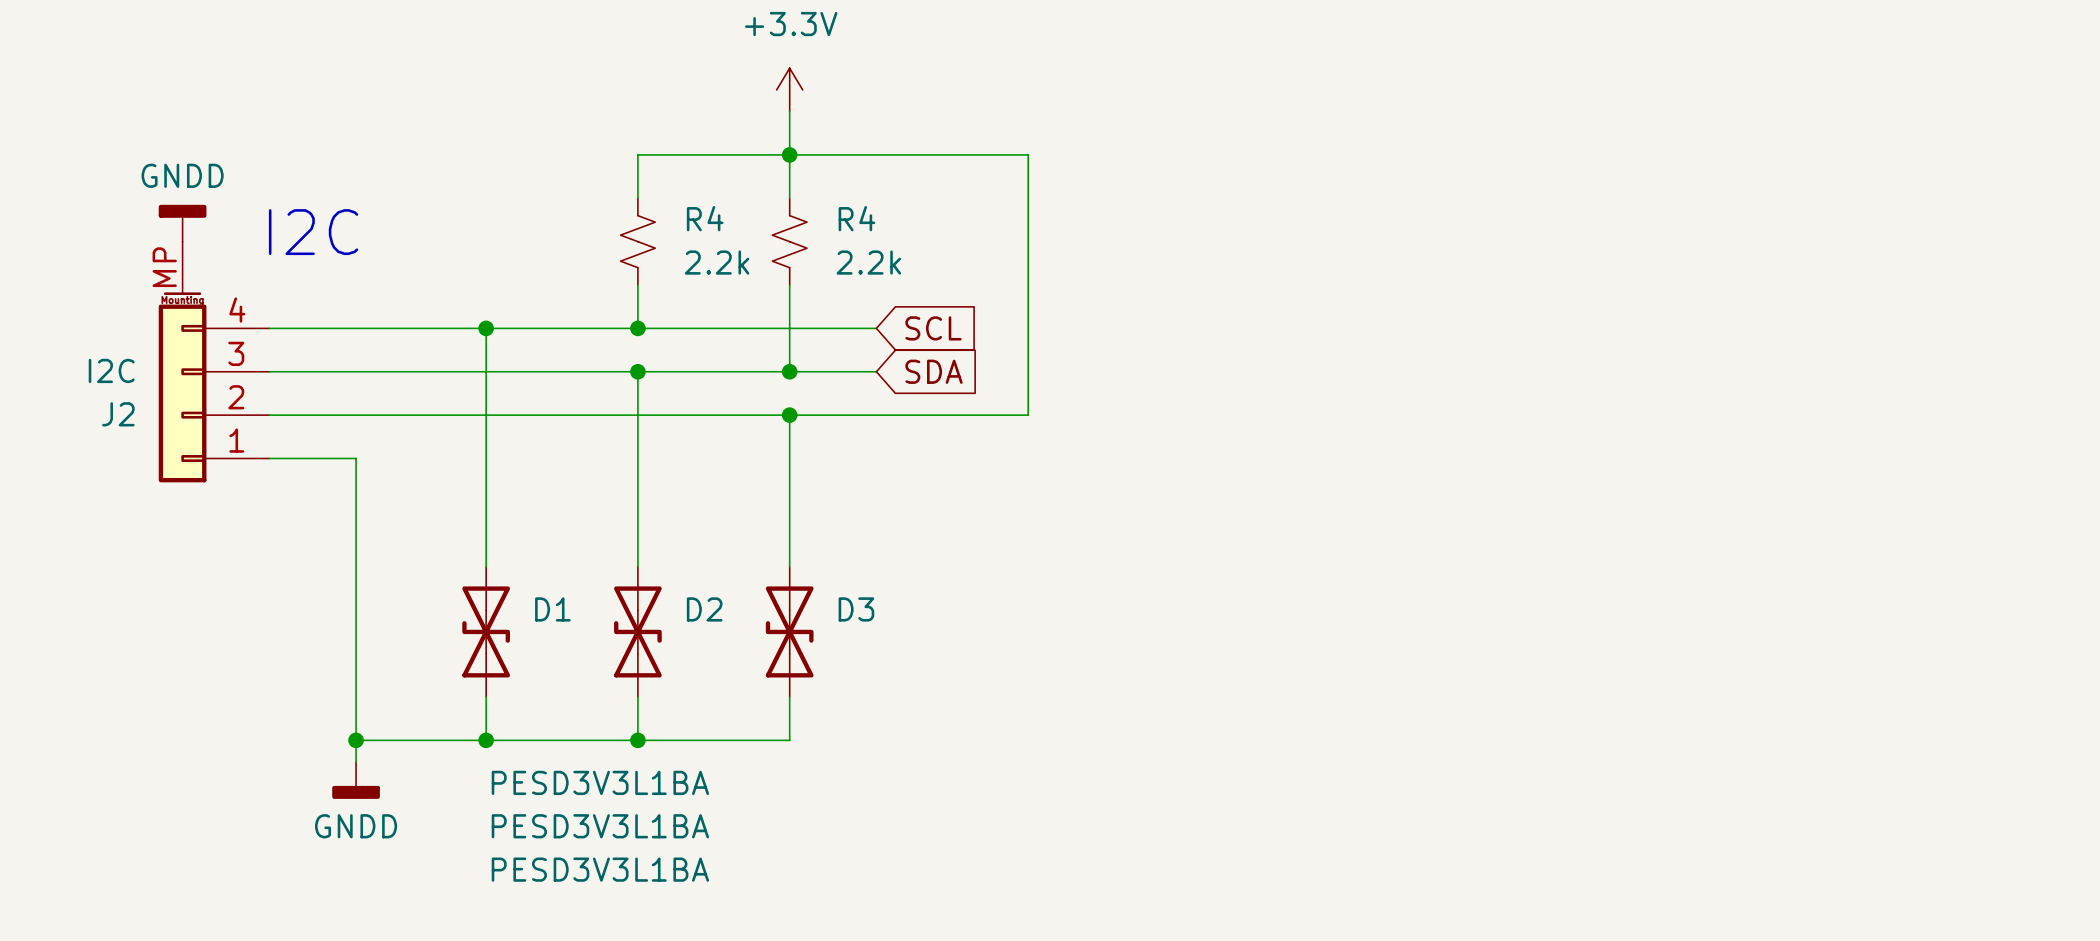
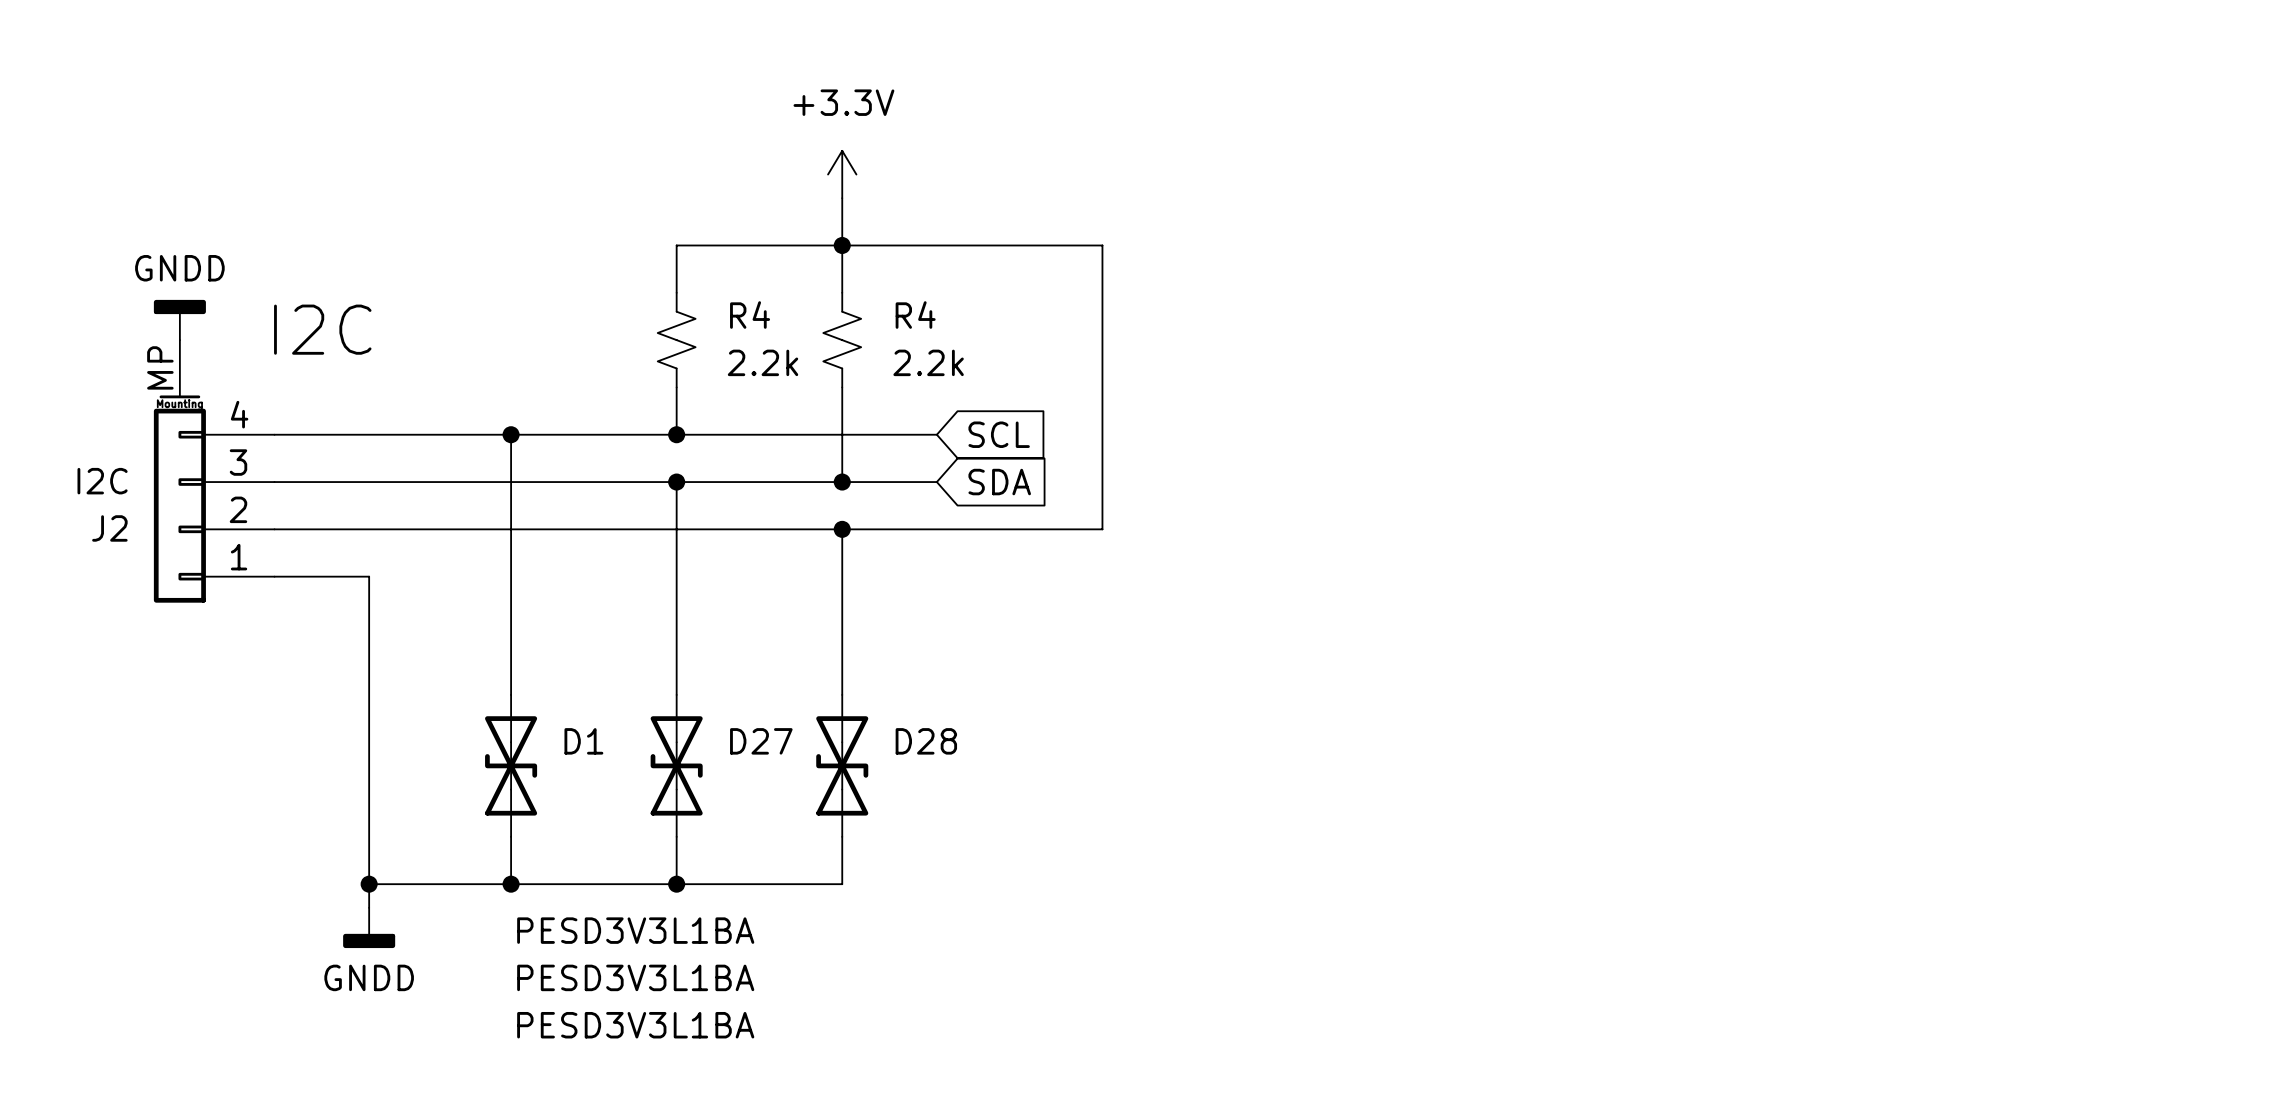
D2 name: D2 (704, 609) -> D27 (761, 741)
D3 name: D3 (856, 609) -> D28 (926, 741)

